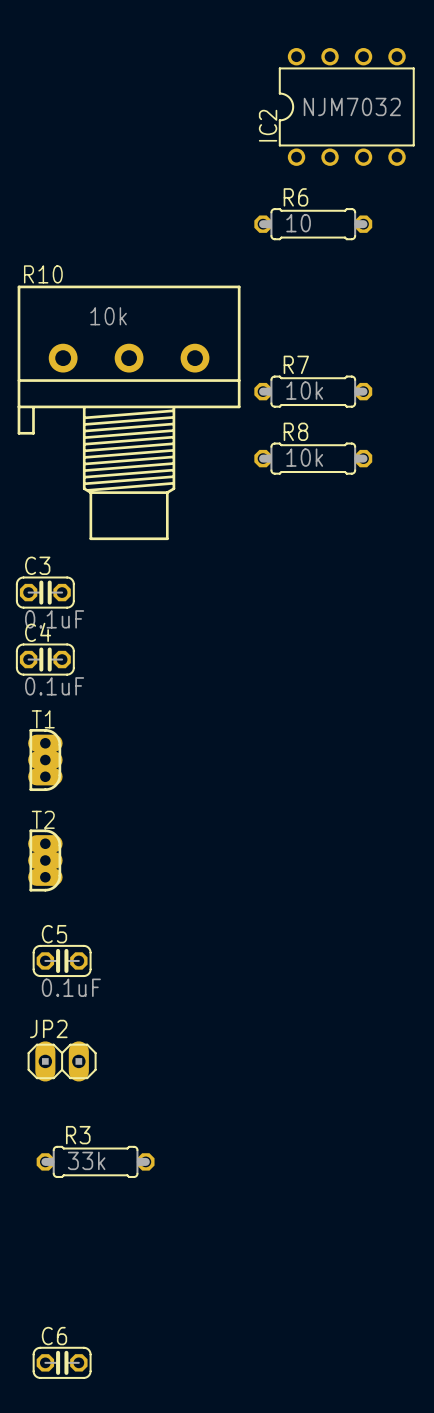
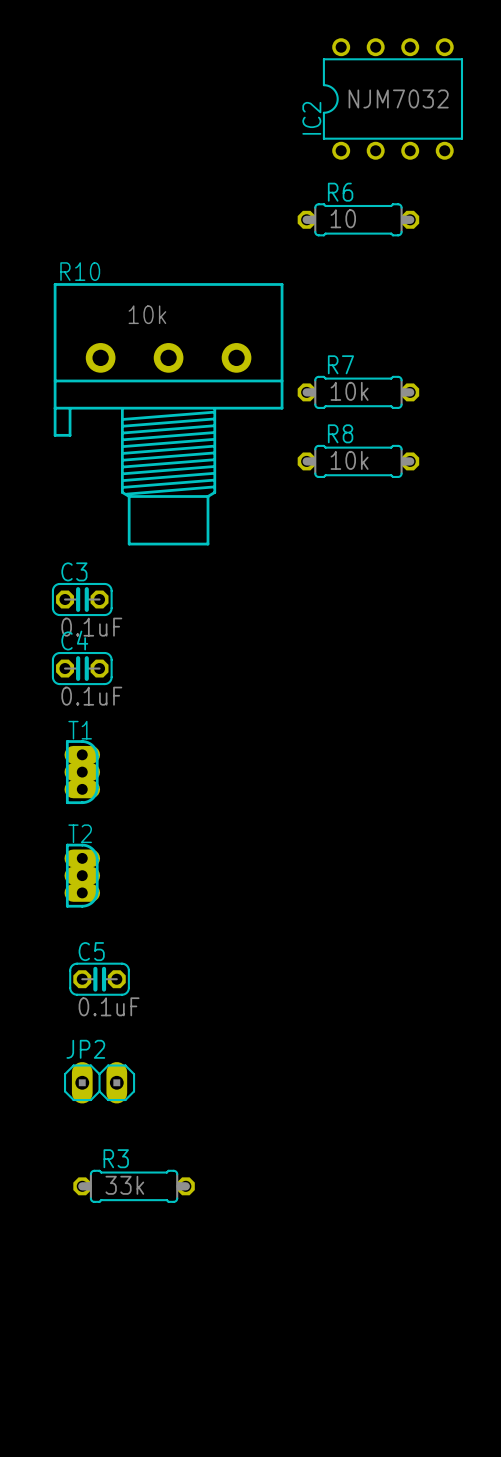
C6: (62, 1362) -> none

